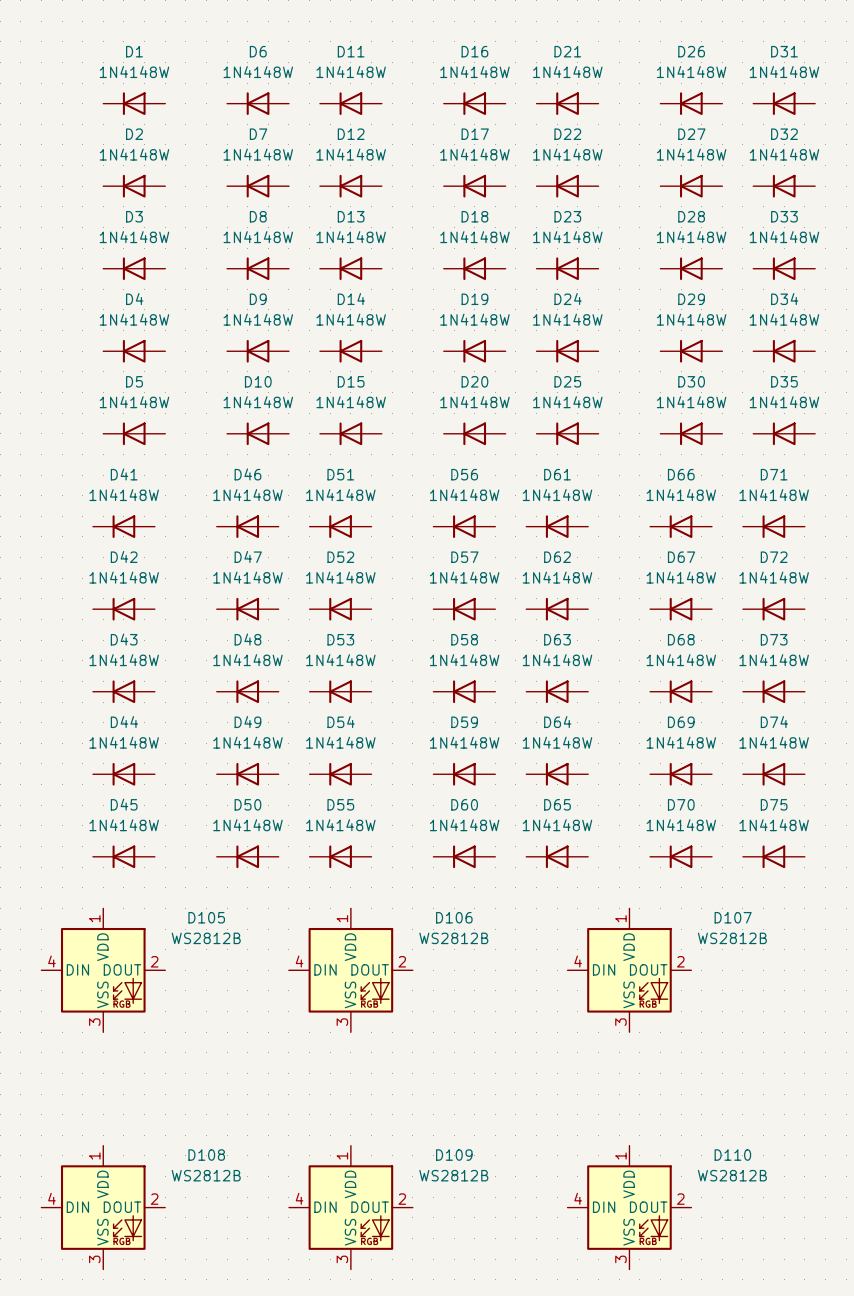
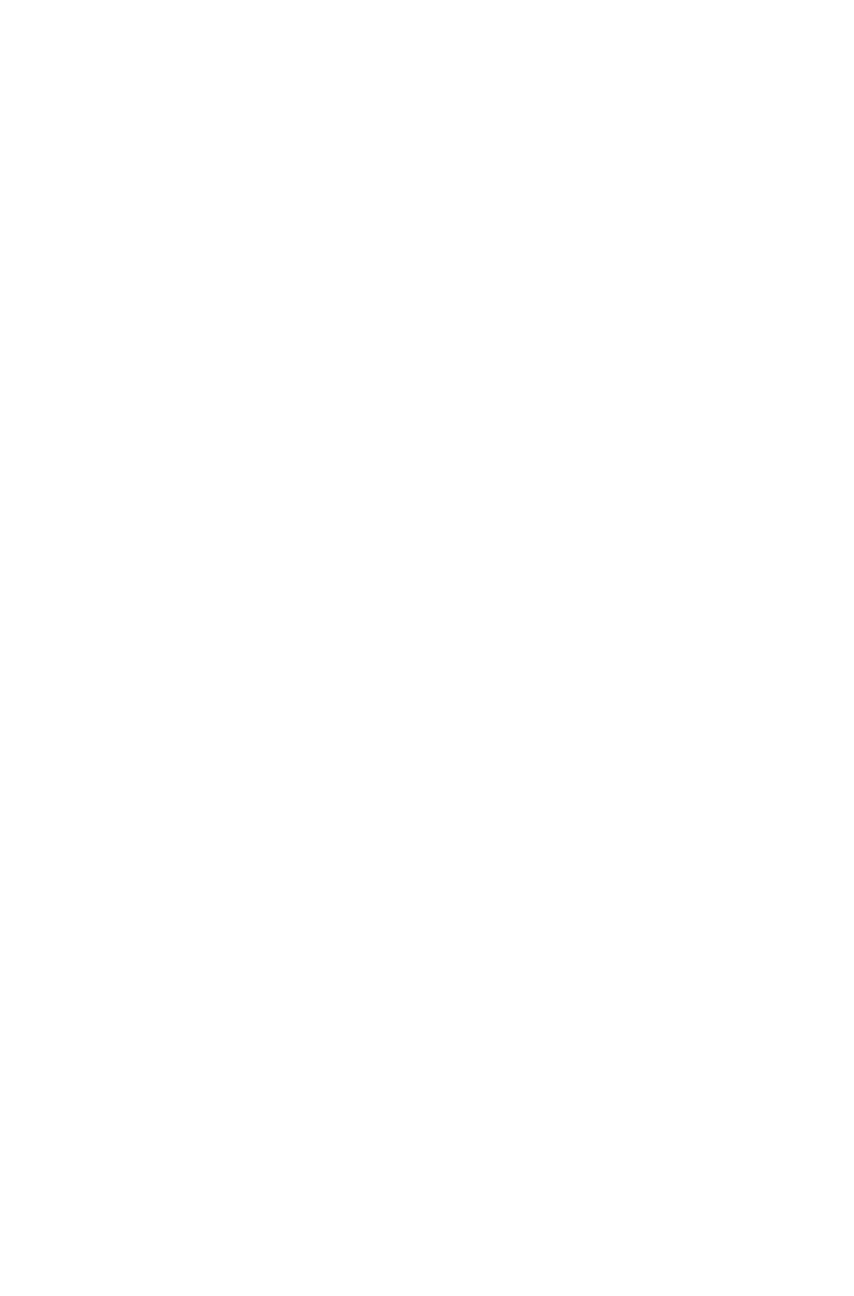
D1: 1N4148W (134, 103) -> none
D6: 1N4148W (258, 103) -> none
D11: 1N4148W (350, 103) -> none
D16: 1N4148W (474, 103) -> none
D21: 1N4148W (567, 103) -> none
D26: 1N4148W (691, 103) -> none
D31: 1N4148W (784, 103) -> none
D2: 1N4148W (134, 186) -> none
D7: 1N4148W (258, 186) -> none
D12: 1N4148W (350, 186) -> none
D17: 1N4148W (474, 186) -> none
D22: 1N4148W (567, 186) -> none
D27: 1N4148W (691, 186) -> none
D32: 1N4148W (784, 186) -> none
D3: 1N4148W (134, 268) -> none
D8: 1N4148W (258, 268) -> none
D13: 1N4148W (350, 268) -> none
D18: 1N4148W (474, 268) -> none
D23: 1N4148W (567, 268) -> none
D28: 1N4148W (691, 268) -> none
D33: 1N4148W (784, 268) -> none
D4: 1N4148W (134, 351) -> none
D9: 1N4148W (258, 351) -> none
D14: 1N4148W (350, 351) -> none
D19: 1N4148W (474, 351) -> none
D24: 1N4148W (567, 351) -> none
D29: 1N4148W (691, 351) -> none
D34: 1N4148W (784, 351) -> none
D5: 1N4148W (134, 433) -> none
D10: 1N4148W (258, 433) -> none
D15: 1N4148W (350, 433) -> none
D20: 1N4148W (474, 433) -> none
D25: 1N4148W (567, 433) -> none
D30: 1N4148W (691, 433) -> none
D35: 1N4148W (784, 433) -> none
D41: 1N4148W (123, 526) -> none
D46: 1N4148W (247, 526) -> none
D51: 1N4148W (340, 526) -> none
D56: 1N4148W (464, 526) -> none
D61: 1N4148W (557, 526) -> none
D66: 1N4148W (681, 526) -> none
D71: 1N4148W (773, 526) -> none
D42: 1N4148W (123, 609) -> none
D47: 1N4148W (247, 609) -> none
D52: 1N4148W (340, 609) -> none
D57: 1N4148W (464, 609) -> none
D62: 1N4148W (557, 609) -> none
D67: 1N4148W (681, 609) -> none
D72: 1N4148W (773, 609) -> none
D43: 1N4148W (123, 691) -> none
D48: 1N4148W (247, 691) -> none
D53: 1N4148W (340, 691) -> none
D58: 1N4148W (464, 691) -> none
D63: 1N4148W (557, 691) -> none
D68: 1N4148W (681, 691) -> none
D73: 1N4148W (773, 691) -> none
D44: 1N4148W (123, 774) -> none
D49: 1N4148W (247, 774) -> none
D54: 1N4148W (340, 774) -> none
D59: 1N4148W (464, 774) -> none
D64: 1N4148W (557, 774) -> none
D69: 1N4148W (681, 774) -> none
D74: 1N4148W (773, 774) -> none
D45: 1N4148W (123, 856) -> none
D50: 1N4148W (247, 856) -> none
D55: 1N4148W (340, 856) -> none
D60: 1N4148W (464, 856) -> none
D65: 1N4148W (557, 856) -> none
D70: 1N4148W (681, 856) -> none
D75: 1N4148W (773, 856) -> none
D105: WS2812B (103, 970) -> none
D106: WS2812B (350, 970) -> none
D107: WS2812B (629, 970) -> none
D108: WS2812B (103, 1207) -> none
D109: WS2812B (350, 1207) -> none
D110: WS2812B (629, 1207) -> none

